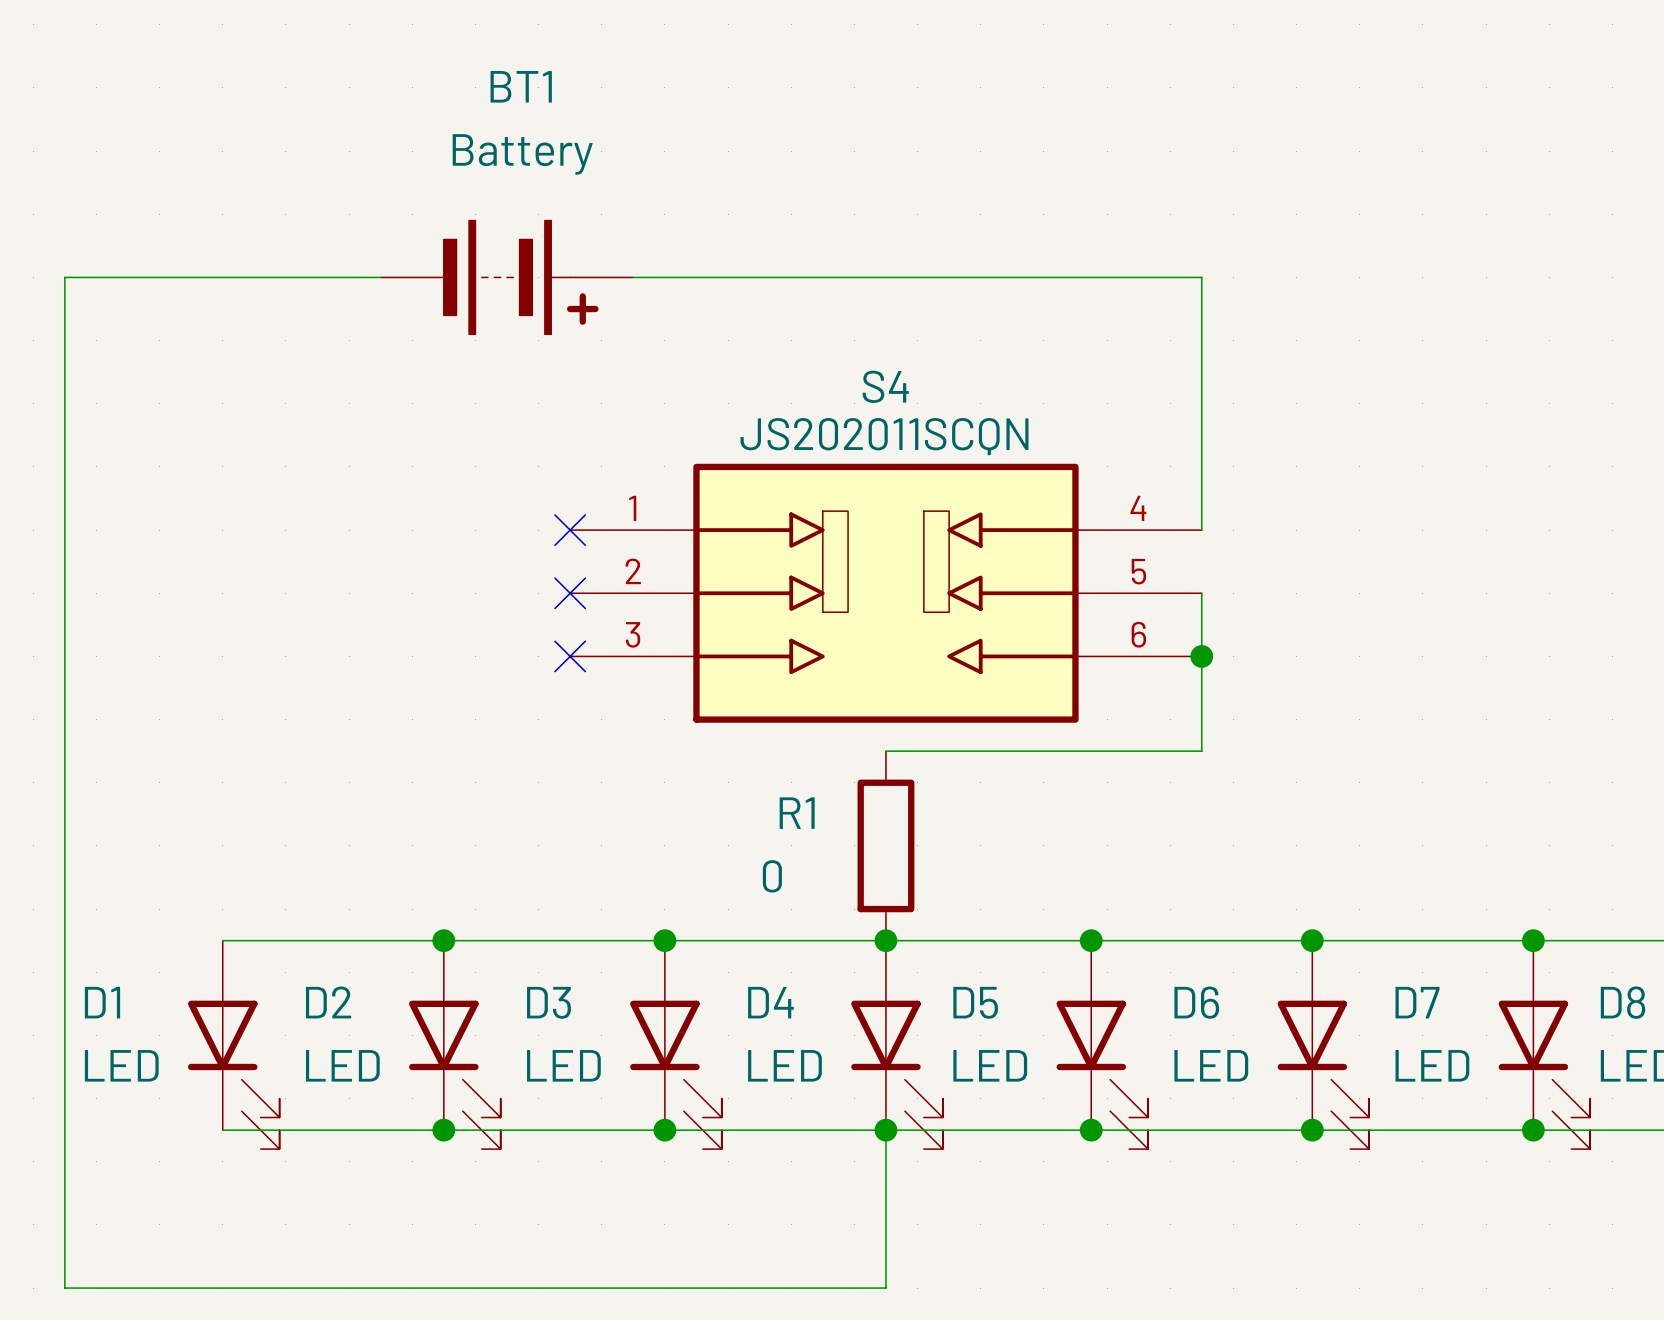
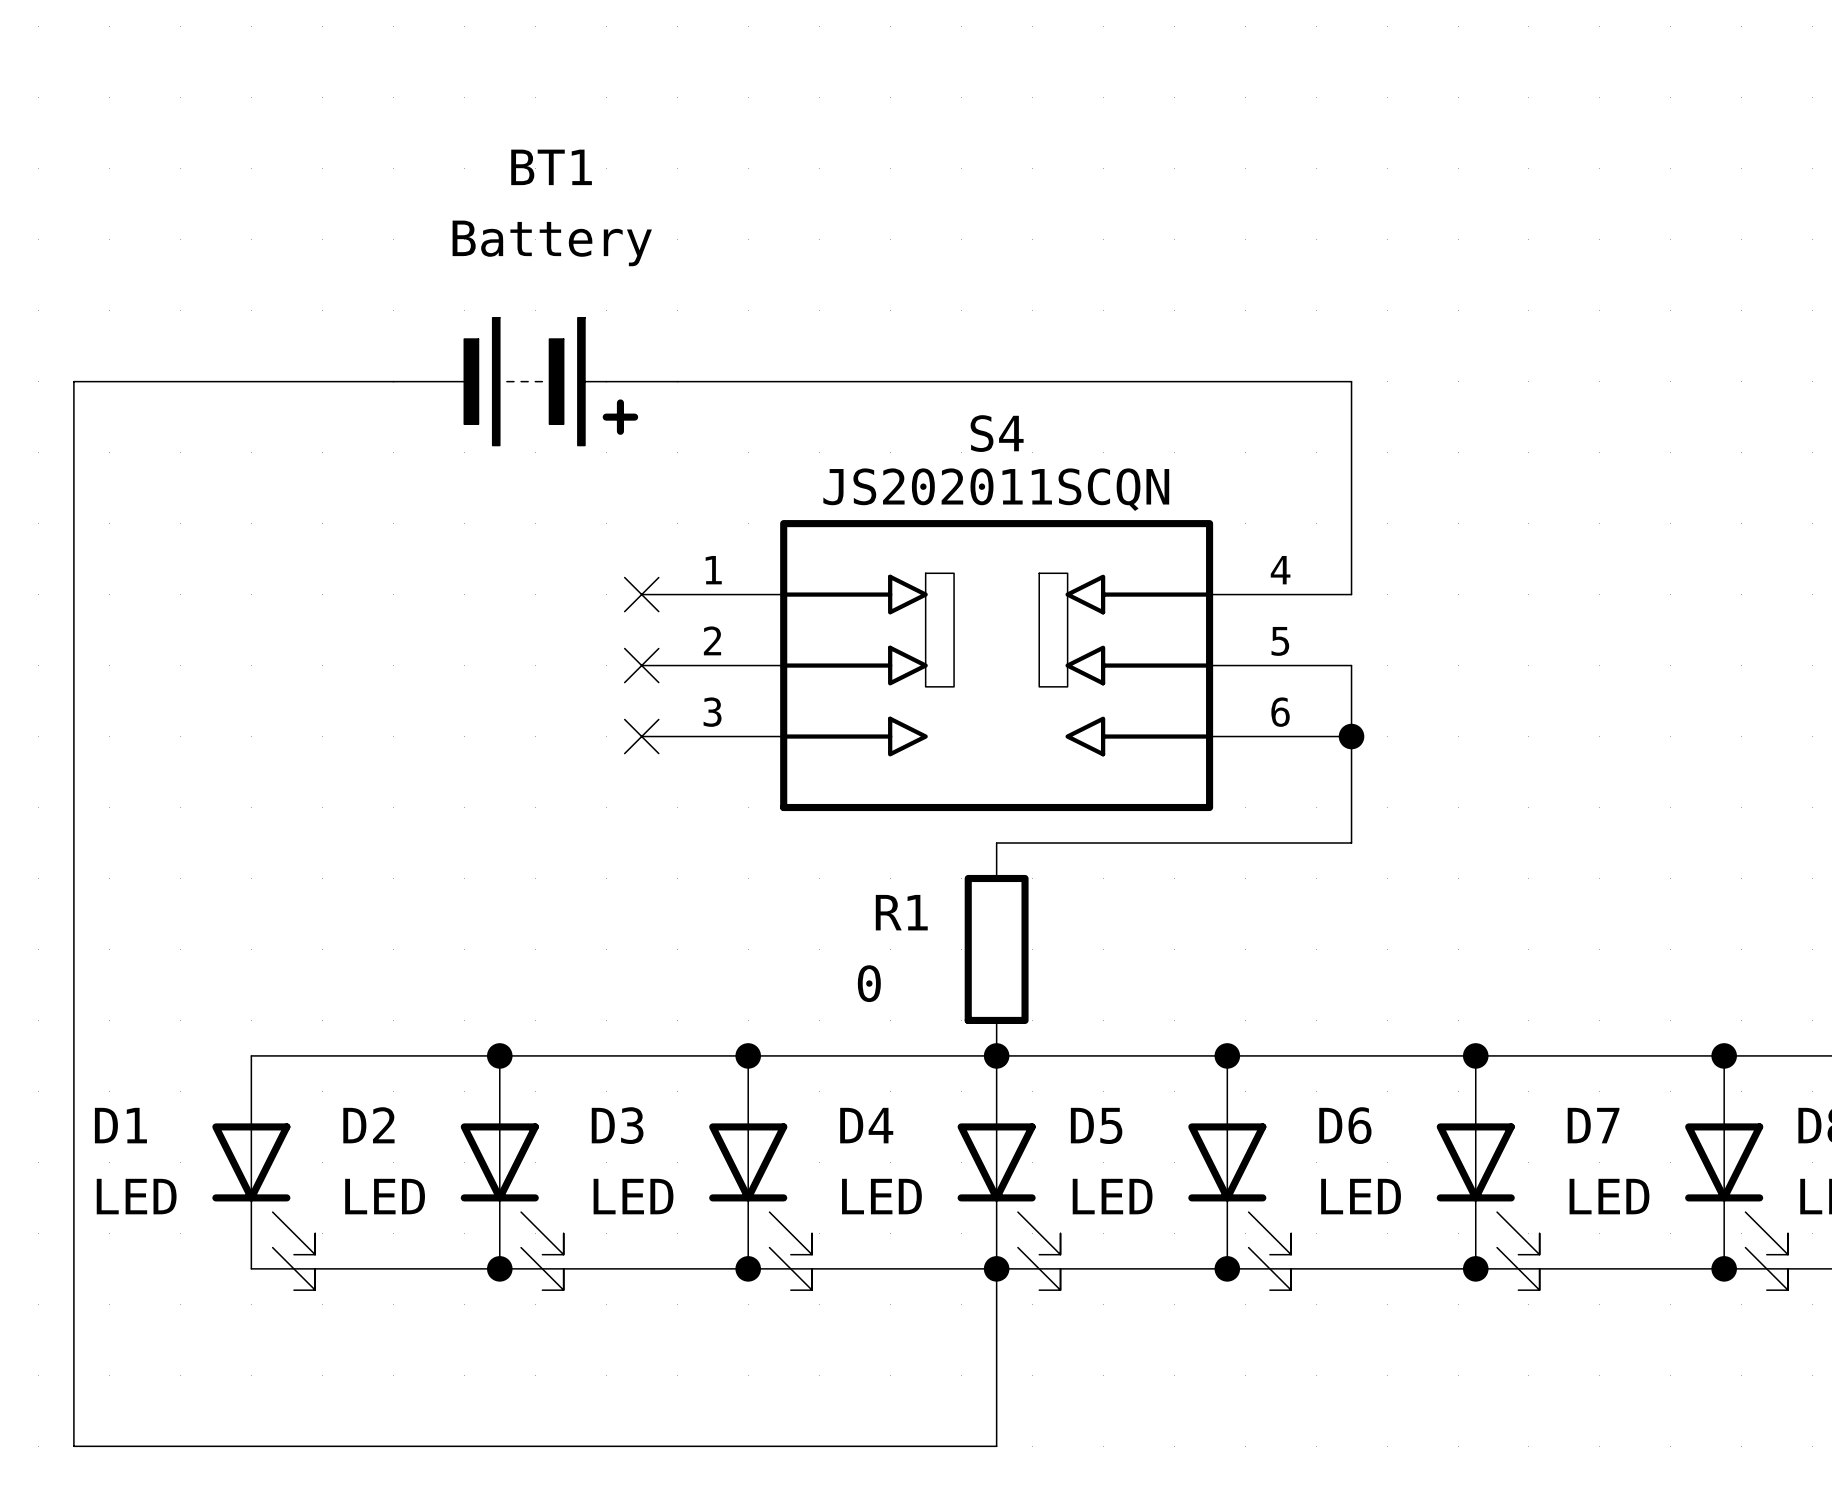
wire: (380, 277) (64, 277) (64, 340) -> (393, 381) (73, 381)
BT1 position: (506, 277) -> (535, 381)
wire: (633, 277) (1201, 277) (1201, 340) -> (677, 381) (1351, 381)

